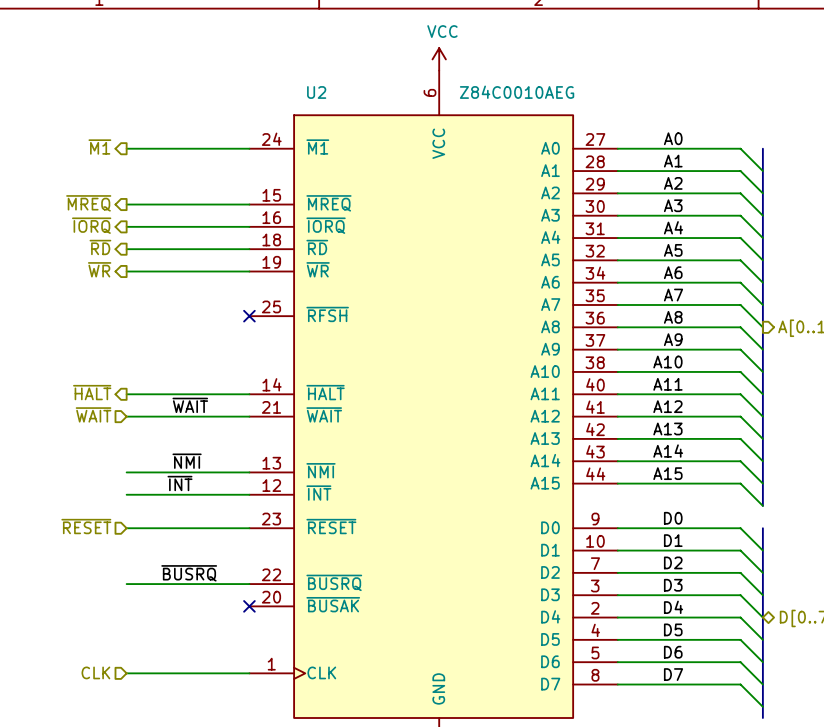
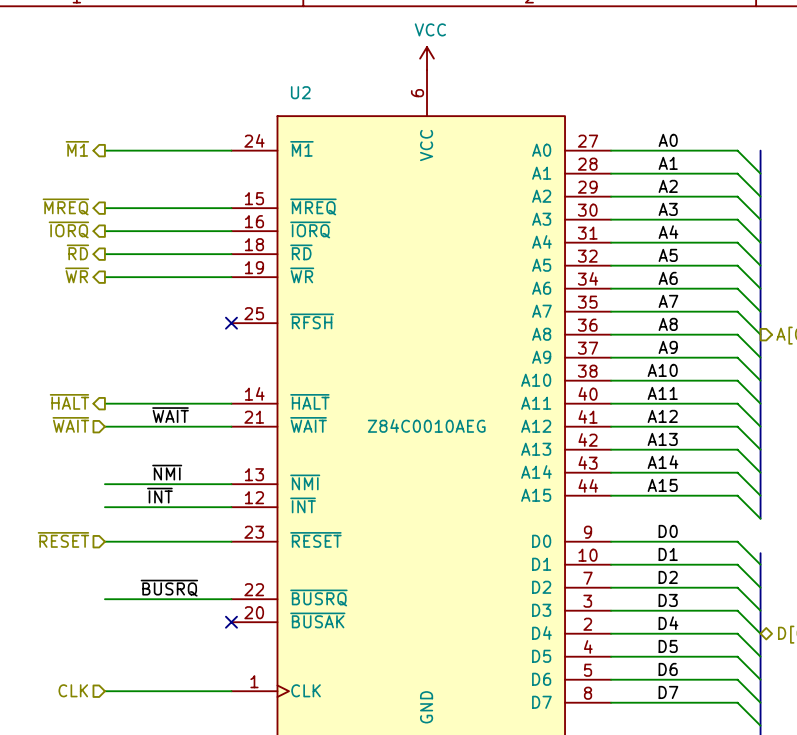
U2 value position: Z84C0010AEG (517, 92) -> Z84C0010AEG (426, 425)
bus: (762, 528) (762, 539) -> none

